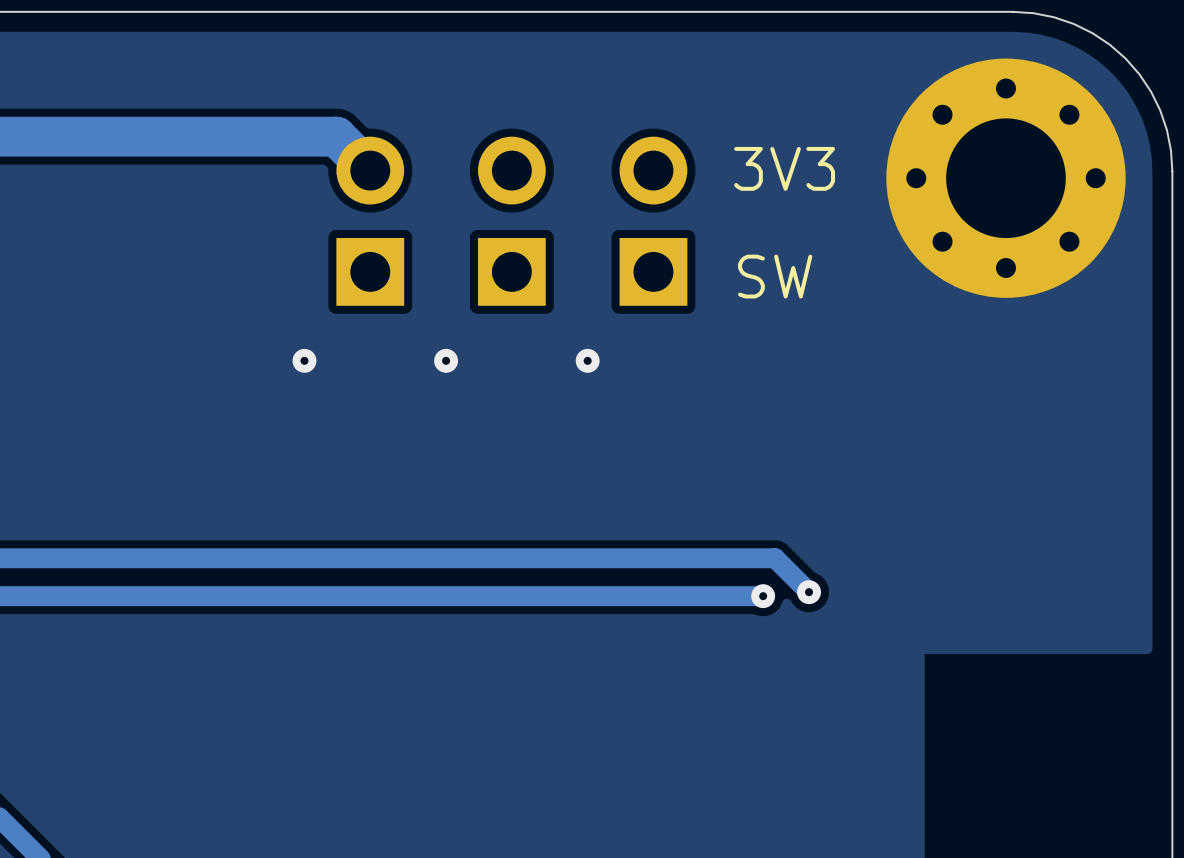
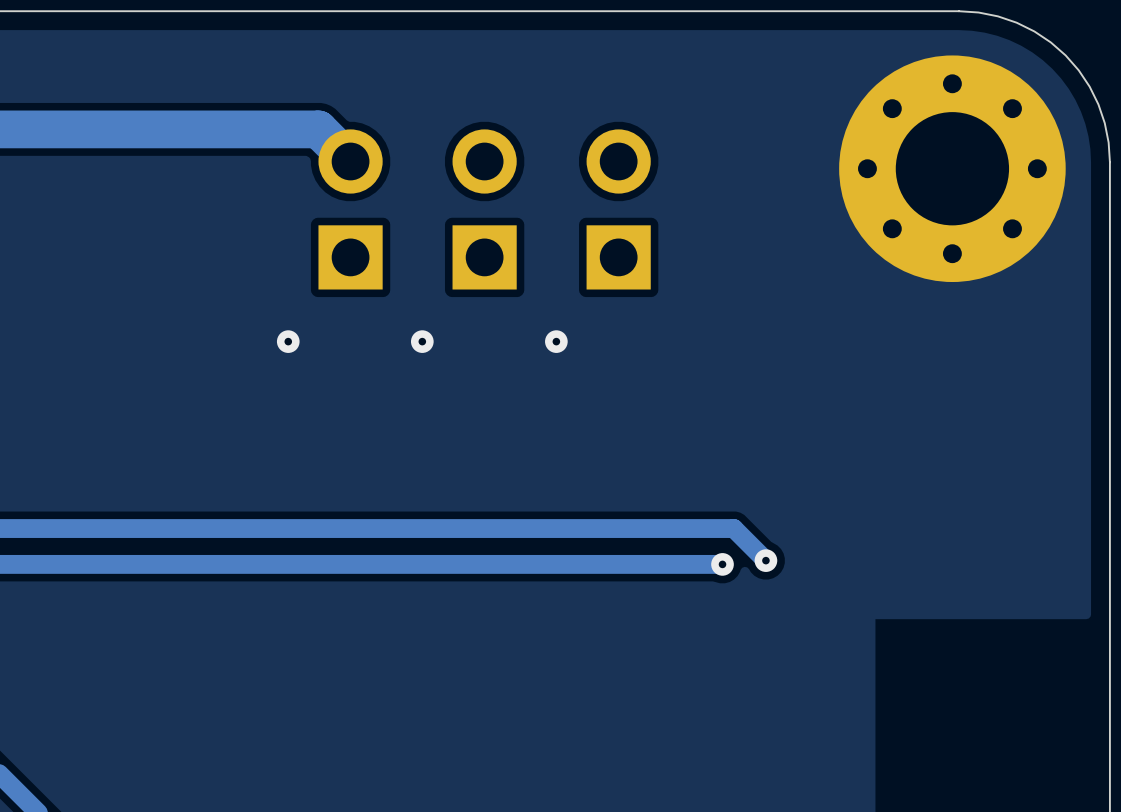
text: 3V3 (784, 168) -> none
text: SW (775, 276) -> none

